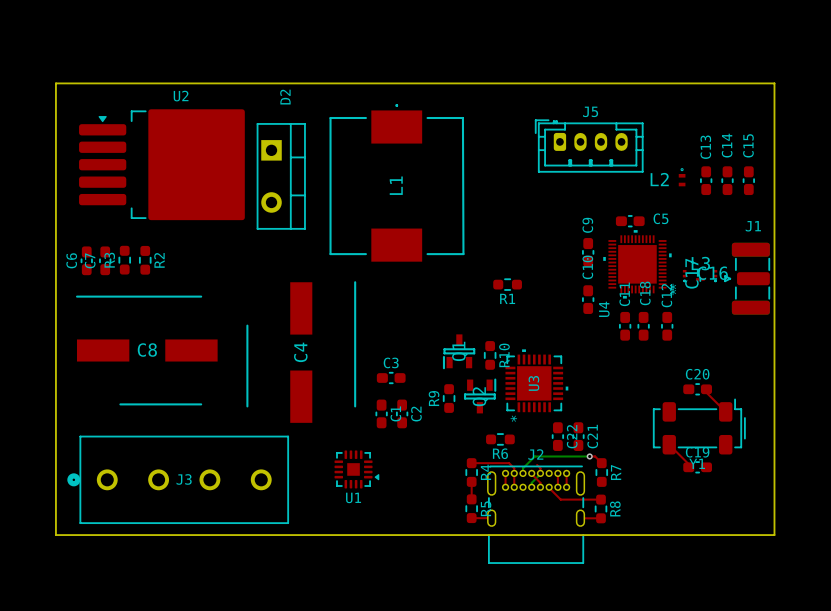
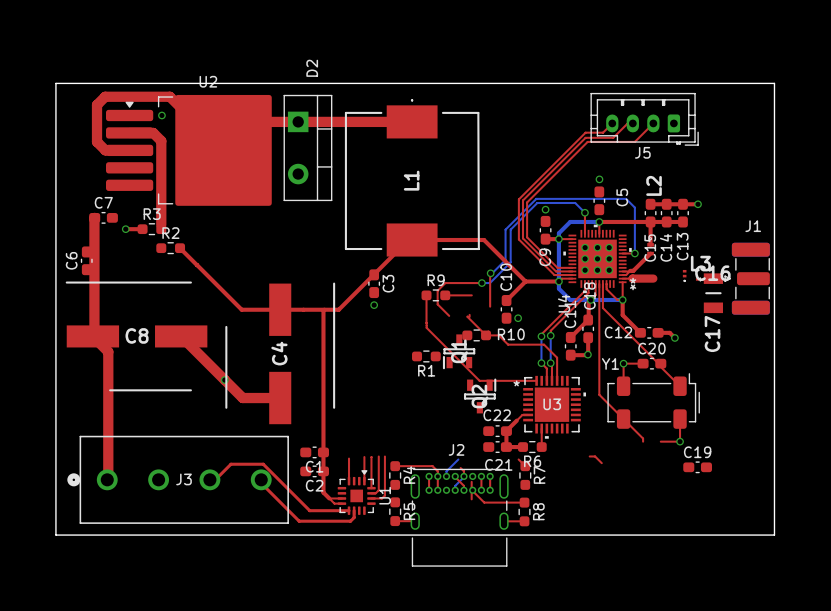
via: none -> (161, 115)
top track: none -> (412, 121) (252, 121) (223, 150) (169, 96) (105, 96) (97, 104) (97, 141) (105, 150) (129, 150)
top track: none -> (612, 123) (603, 132) (585, 132) (518, 199) (518, 239) (554, 275) (572, 275)
top track: none -> (632, 123) (627, 123) (613, 137) (585, 137) (522, 200) (522, 238) (556, 271) (572, 271)
top track: none -> (653, 123) (634, 141) (587, 141) (527, 202) (527, 237) (557, 267) (572, 267)
top track: none -> (129, 132) (153, 132) (161, 141) (161, 224)
C14 name position: C14 (727, 145) -> C14 (666, 247)
C15 name position: C15 (748, 145) -> C15 (650, 248)
J5 rotation: 0° (589, 146) -> 180° (644, 119)
C13 name position: C13 (705, 147) -> C13 (682, 246)
U2 position: (161, 164) -> (188, 150)
D2 position: (281, 176) -> (307, 147)
L2 position: (682, 177) -> (650, 246)
via: none -> (599, 179)
L2 name rotation: 0° (659, 179) -> 90° counterclockwise (654, 185)
C13 position: (706, 180) -> (683, 213)
C14 position: (727, 180) -> (666, 213)
C15 position: (748, 180) -> (650, 213)
L1 position: (397, 183) -> (412, 177)
top track: none -> (650, 204) (698, 204)
via: none -> (698, 204)
via: none -> (545, 209)
top track: none -> (584, 212) (584, 233)
bottom track: none -> (584, 212) (575, 202) (537, 202) (510, 229) (510, 262) (490, 283) (481, 283)
via: none -> (584, 212)
top track: none -> (94, 217) (94, 338)
bottom track: none -> (599, 221) (570, 221) (558, 233) (558, 288) (570, 299) (622, 299)
via: none -> (599, 221)
C5 rotation: 0° (630, 221) -> 90° clockwise (599, 200)
C5 position: (630, 221) -> (599, 200)
top track: none -> (650, 221) (650, 244)
top track: none -> (683, 221) (599, 221) (599, 233)
C9 name position: C9 (587, 225) -> C9 (545, 257)
top track: none -> (125, 229) (142, 229)
via: none -> (125, 229)
top track: none -> (416, 231) (338, 309) (241, 309) (180, 248)
top track: none -> (545, 239) (572, 239)
via: none -> (558, 239)
top track: none -> (412, 240) (484, 240) (525, 281)
via: none -> (585, 247)
via: none -> (597, 247)
via: none -> (609, 247)
C9 position: (588, 252) -> (545, 230)
top track: none -> (622, 253) (634, 253)
bottom track: none -> (634, 253) (634, 207) (626, 198) (536, 198) (505, 229) (505, 259) (490, 273)
via: none -> (634, 253)
top track: none -> (650, 253) (633, 270) (630, 270)
via: none -> (585, 258)
via: none -> (597, 258)
via: none -> (609, 258)
C7 rotation: 0° (105, 260) -> 90° clockwise (103, 217)
C7 position: (105, 260) -> (103, 217)
R3 rotation: 0° (124, 260) -> 90° clockwise (151, 229)
R3 position: (124, 260) -> (151, 229)
R2 rotation: 0° (145, 260) -> 90° clockwise (170, 248)
R2 position: (145, 260) -> (170, 248)
R2 name position: R2 (159, 260) -> R2 (170, 233)
U4 position: (637, 264) -> (597, 258)
C17 footprint: [713, 269, 718, 282] -> [703, 273, 724, 314]
via: none -> (585, 270)
via: none -> (597, 270)
via: none -> (609, 270)
top track: none -> (622, 271) (629, 271) (626, 275) (622, 275)
top track: none -> (490, 273) (490, 306)
via: none -> (490, 273)
C17 name position: C17 (691, 273) -> C17 (712, 333)
top track: none -> (572, 278) (561, 278) (558, 281) (525, 281)
top track: none -> (622, 278) (632, 278)
top track: none -> (632, 278) (653, 278)
top track: none -> (525, 281) (506, 300)
via: none -> (558, 281)
top track: none -> (622, 282) (622, 299)
top track: none -> (481, 283) (445, 283) (437, 290) (437, 304) (449, 315)
via: none -> (481, 283)
R1 position: (507, 284) -> (426, 356)
top track: none -> (584, 284) (584, 290) (541, 336)
top track: none -> (588, 284) (588, 292) (550, 330) (550, 335)
top track: none -> (595, 284) (595, 295) (588, 302) (588, 319) (570, 337)
top track: none -> (599, 284) (599, 394) (643, 438) (643, 441)
top track: none -> (602, 284) (602, 308) (658, 363) (660, 363) (660, 366) (680, 386)
top track: none -> (606, 284) (606, 289) (617, 299) (622, 299)
top track: none -> (426, 295) (426, 322)
top track: none -> (445, 295) (471, 295)
C12 name position: C12 (666, 295) -> C12 (618, 332)
C10 position: (588, 299) -> (506, 309)
via: none -> (590, 299)
top track: none -> (622, 299) (622, 315) (640, 332)
via: none -> (622, 299)
via: none -> (374, 305)
top track: none -> (324, 309) (323, 492) (329, 498)
top track: none -> (469, 314) (469, 316)
top track: none -> (467, 316) (486, 335) (498, 335) (508, 344) (544, 344) (557, 357) (557, 380)
via: none -> (518, 318)
top track: none -> (426, 323) (426, 327) (479, 380) (536, 380)
C11 position: (625, 326) -> (570, 346)
C18 position: (643, 326) -> (588, 328)
C12 rotation: 0° (667, 326) -> 90° clockwise (649, 332)
C12 position: (667, 326) -> (649, 332)
top track: none -> (658, 332) (669, 332) (674, 337)
via: none -> (550, 335)
top track: none -> (92, 336) (108, 351) (108, 484)
top track: none -> (181, 336) (242, 398) (280, 398)
bottom track: none -> (541, 336) (541, 363)
via: none -> (541, 336)
bottom track: none -> (550, 336) (550, 363)
top track: none -> (588, 337) (588, 354) (570, 355)
via: none -> (674, 337)
C8 position: (146, 350) -> (136, 336)
C4 position: (301, 352) -> (280, 353)
via: none -> (587, 354)
R10 rotation: 0° (490, 355) -> 90° clockwise (476, 335)
R10 position: (490, 355) -> (476, 335)
top track: none -> (541, 363) (546, 368) (546, 380)
via: none -> (541, 363)
top track: none -> (550, 363) (551, 380)
via: none -> (550, 363)
via: none -> (623, 363)
top track: none -> (643, 363) (623, 363) (623, 386)
C3 rotation: 0° (391, 378) -> 90° clockwise (374, 283)
C3 position: (391, 378) -> (374, 283)
via: none -> (224, 380)
U3 rotation: 0° (536, 380) -> 90° clockwise (554, 407)
C20 position: (697, 389) -> (651, 363)
top track: (706, 389) (706, 392) (725, 411) -> none
R9 rotation: 0° (449, 398) -> 90° clockwise (435, 295)
R9 position: (449, 398) -> (435, 295)
C1 rotation: 0° (381, 413) -> 90° clockwise (314, 452)
C1 position: (381, 413) -> (314, 452)
C2 rotation: 0° (402, 413) -> 90° clockwise (314, 471)
C2 position: (402, 413) -> (314, 471)
top track: none -> (528, 414) (522, 414) (506, 431) (506, 447) (522, 447)
top track: none -> (680, 419) (680, 441) (660, 441)
Y1 position: (699, 426) -> (653, 401)
top track: none -> (541, 428) (541, 447)
C22 rotation: 0° (557, 436) -> 90° clockwise (497, 431)
C22 position: (557, 436) -> (497, 431)
C22 name position: C22 (572, 436) -> C22 (497, 415)
C21 rotation: 0° (578, 436) -> 90° clockwise (497, 447)
C21 position: (578, 436) -> (497, 447)
R6 position: (500, 439) -> (532, 447)
via: none -> (680, 441)
top track: (669, 444) (688, 464) (688, 467) -> none
J2 name position: J2 (535, 454) -> J2 (456, 449)
top track: none -> (378, 456) (378, 490) (375, 493) (371, 493)
top track: none -> (384, 456) (384, 495) (381, 498) (371, 498)
bottom track: (589, 456) (534, 456) (522, 468) (522, 473) -> none
via: (589, 456) -> none
top track: none -> (364, 457) (364, 481)
top track: none -> (371, 457) (371, 488)
top track: none -> (349, 458) (349, 481)
bottom track: none -> (458, 459) (446, 471) (446, 476)
top track: none -> (518, 459) (525, 466)
top track: (471, 463) (509, 463) (514, 468) (514, 487) -> (395, 466) (432, 466) (437, 471) (437, 490)
Y1 name position: Y1 (697, 463) -> Y1 (610, 363)
top track: (537, 465) (540, 468) (540, 473) -> (460, 468) (463, 471) (463, 476)
U1 rotation: 0° (356, 469) -> 90° counterclockwise (356, 492)
R4 position: (471, 472) -> (395, 475)
R7 position: (601, 472) -> (525, 475)
top track: (505, 473) (505, 487) -> (429, 476) (429, 490)
top track: (531, 473) (540, 482) (540, 487) -> (455, 476) (463, 485) (463, 490)
bottom track: (540, 473) (531, 482) (531, 487) -> (463, 476) (455, 485) (455, 490)
top track: (557, 473) (557, 487) -> (481, 476) (481, 490)
top track: (566, 473) (566, 487) -> (490, 476) (490, 490)
top track: none -> (210, 484) (230, 464) (263, 464) (309, 510) (349, 510)
top track: none -> (262, 484) (299, 521) (350, 521) (354, 517) (354, 510)
top track: (549, 487) (560, 499) (601, 499) -> (472, 490) (484, 502) (524, 502)
top track: none -> (329, 498) (341, 498)
top track: none -> (329, 498) (334, 503) (341, 503)
R5 position: (471, 508) -> (395, 511)
R8 position: (601, 508) -> (524, 511)
J2 position: (536, 514) -> (459, 517)
top track: (471, 518) (491, 518) -> (395, 521) (415, 521)
top track: (580, 518) (601, 518) -> (504, 521) (524, 521)

